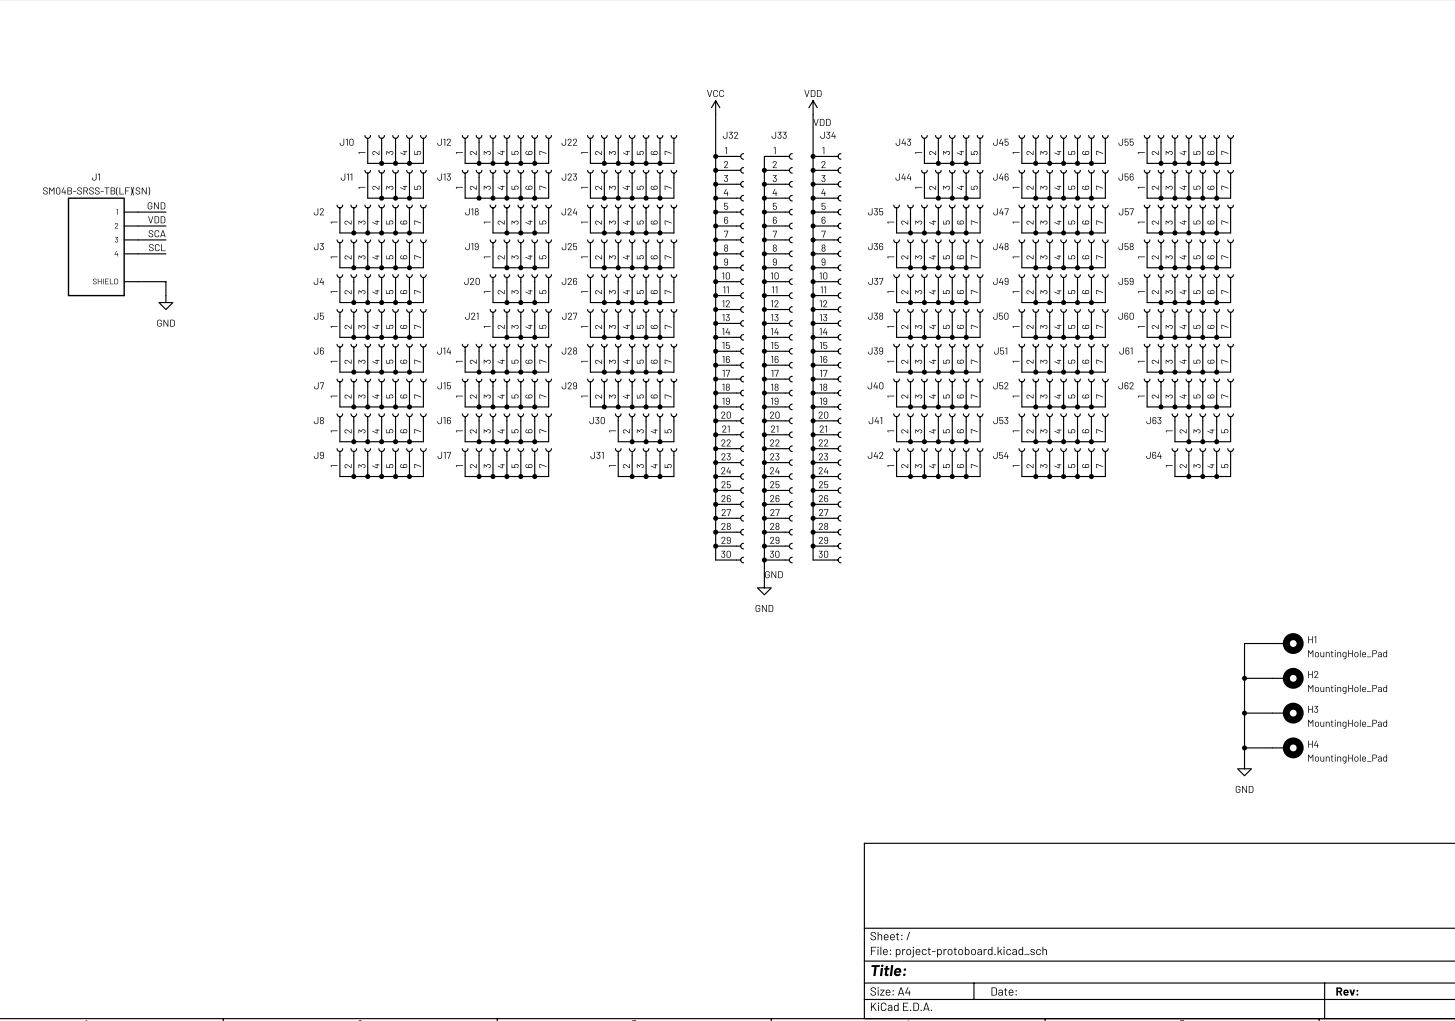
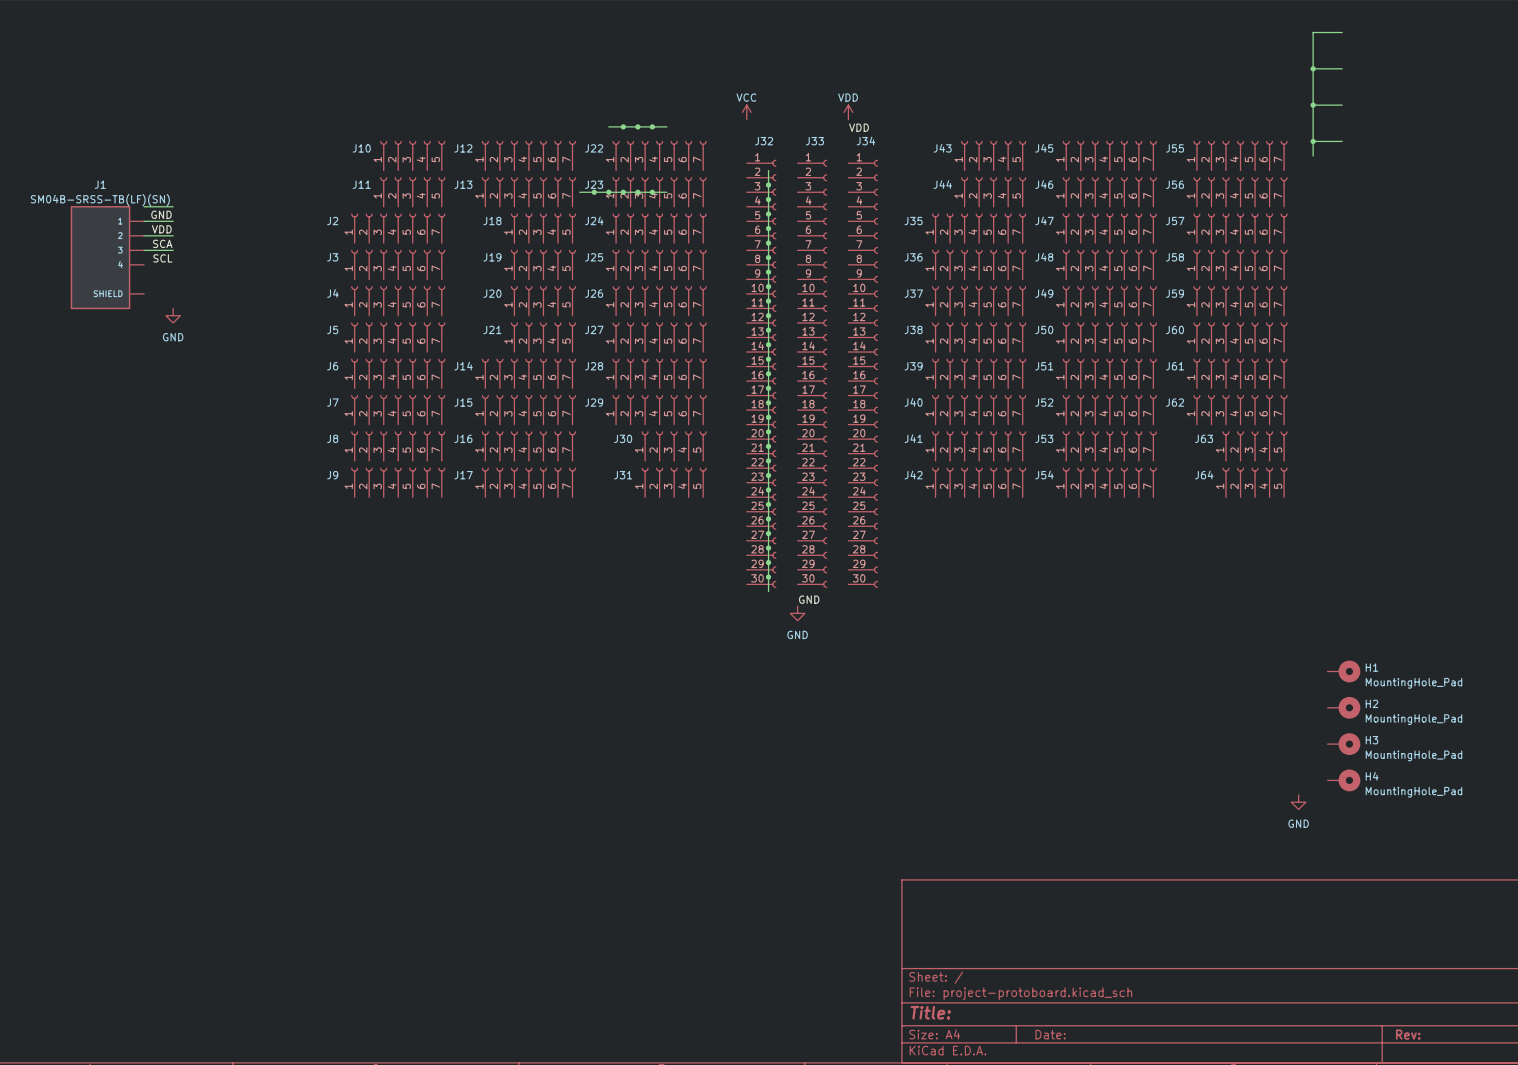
wire: none -> (1342, 32) (1313, 32) (1313, 155)
wire: none -> (1313, 68) (1342, 68)
junction: none -> (1313, 68)
wire: none -> (1313, 105) (1342, 105)
junction: none -> (1313, 105)
wire: (715, 114) (715, 560) -> none
wire: (813, 114) (813, 560) -> none
wire: none -> (608, 126) (666, 126)
junction: none -> (623, 126)
junction: none -> (637, 126)
junction: none -> (652, 126)
wire: none -> (1313, 141) (1342, 141)
junction: none -> (1313, 141)
junction: (715, 156) -> none
wire: (764, 156) (764, 580) -> none
junction: (813, 156) -> none
wire: (367, 163) (423, 163) -> none
junction: (381, 163) -> none
junction: (395, 163) -> none
junction: (409, 163) -> none
wire: (465, 163) (548, 163) -> none
junction: (479, 163) -> none
junction: (492, 163) -> none
junction: (506, 163) -> none
junction: (520, 163) -> none
junction: (534, 163) -> none
wire: (590, 163) (673, 163) -> none
junction: (604, 163) -> none
junction: (618, 163) -> none
junction: (632, 163) -> none
junction: (646, 163) -> none
junction: (659, 163) -> none
wire: none -> (768, 170) (768, 591)
wire: (924, 163) (980, 163) -> none
junction: (938, 163) -> none
junction: (952, 163) -> none
junction: (966, 163) -> none
wire: (1021, 163) (1105, 163) -> none
junction: (1035, 163) -> none
junction: (1049, 163) -> none
junction: (1063, 163) -> none
junction: (1077, 163) -> none
junction: (1091, 163) -> none
wire: (1147, 163) (1230, 163) -> none
junction: (1161, 163) -> none
junction: (1174, 163) -> none
junction: (1188, 163) -> none
junction: (1202, 163) -> none
junction: (1216, 163) -> none
junction: (715, 170) -> none
junction: (764, 170) -> none
junction: (813, 170) -> none
junction: none -> (768, 185)
junction: none -> (594, 192)
junction: none -> (608, 192)
junction: none -> (623, 192)
junction: none -> (637, 192)
junction: none -> (652, 192)
junction: (715, 184) -> none
junction: (764, 184) -> none
junction: (813, 184) -> none
junction: none -> (768, 199)
wire: (367, 198) (423, 198) -> none
junction: (381, 198) -> none
junction: (395, 198) -> none
junction: (409, 198) -> none
wire: (465, 198) (548, 198) -> none
junction: (479, 198) -> none
junction: (492, 198) -> none
junction: (506, 198) -> none
junction: (520, 198) -> none
junction: (534, 198) -> none
wire: (590, 198) (673, 198) -> (579, 192) (666, 192)
junction: (604, 198) -> none
junction: (618, 198) -> none
junction: (632, 198) -> none
junction: (646, 198) -> none
junction: (659, 198) -> none
junction: (715, 198) -> none
junction: (764, 198) -> none
junction: (813, 198) -> none
wire: (924, 198) (980, 198) -> none
junction: (938, 198) -> none
junction: (952, 198) -> none
junction: (966, 198) -> none
wire: (1021, 198) (1105, 198) -> none
junction: (1035, 198) -> none
junction: (1049, 198) -> none
junction: (1063, 198) -> none
junction: (1077, 198) -> none
junction: (1091, 198) -> none
wire: (1147, 198) (1230, 198) -> none
junction: (1161, 198) -> none
junction: (1174, 198) -> none
junction: (1188, 198) -> none
junction: (1202, 198) -> none
junction: (1216, 198) -> none
junction: none -> (768, 214)
junction: (715, 212) -> none
junction: (764, 212) -> none
junction: (813, 212) -> none
junction: none -> (768, 228)
junction: (715, 226) -> none
junction: (764, 226) -> none
junction: (813, 226) -> none
wire: (339, 232) (423, 232) -> none
junction: (353, 232) -> none
junction: (367, 232) -> none
junction: (381, 232) -> none
junction: (395, 232) -> none
junction: (409, 232) -> none
wire: (492, 232) (548, 232) -> none
junction: (506, 232) -> none
junction: (520, 232) -> none
junction: (534, 232) -> none
wire: (590, 232) (673, 232) -> none
junction: (604, 232) -> none
junction: (618, 232) -> none
junction: (632, 232) -> none
junction: (646, 232) -> none
junction: (659, 232) -> none
junction: none -> (768, 243)
wire: (896, 232) (980, 232) -> none
junction: (910, 232) -> none
junction: (924, 232) -> none
junction: (938, 232) -> none
junction: (952, 232) -> none
junction: (966, 232) -> none
wire: (1021, 232) (1105, 232) -> none
junction: (1035, 232) -> none
junction: (1049, 232) -> none
junction: (1063, 232) -> none
junction: (1077, 232) -> none
junction: (1091, 232) -> none
wire: (1147, 232) (1230, 232) -> none
junction: (1161, 232) -> none
junction: (1174, 232) -> none
junction: (1188, 232) -> none
junction: (1202, 232) -> none
junction: (1216, 232) -> none
junction: (715, 239) -> none
junction: (764, 239) -> none
junction: (813, 239) -> none
junction: none -> (768, 257)
wire: (138, 253) (165, 253) -> (144, 206) (173, 206)
junction: (715, 253) -> none
junction: (764, 253) -> none
junction: (813, 253) -> none
junction: none -> (768, 272)
wire: (339, 267) (423, 267) -> none
junction: (353, 267) -> none
junction: (367, 267) -> none
junction: (381, 267) -> none
junction: (395, 267) -> none
junction: (409, 267) -> none
wire: (492, 267) (548, 267) -> none
junction: (506, 267) -> none
junction: (520, 267) -> none
junction: (534, 267) -> none
wire: (590, 267) (673, 267) -> none
junction: (604, 267) -> none
junction: (618, 267) -> none
junction: (632, 267) -> none
junction: (646, 267) -> none
junction: (659, 267) -> none
junction: (715, 267) -> none
junction: (764, 267) -> none
junction: (813, 267) -> none
wire: (896, 267) (980, 267) -> none
junction: (910, 267) -> none
junction: (924, 267) -> none
junction: (938, 267) -> none
junction: (952, 267) -> none
junction: (966, 267) -> none
wire: (1021, 267) (1105, 267) -> none
junction: (1035, 267) -> none
junction: (1049, 267) -> none
junction: (1063, 267) -> none
junction: (1077, 267) -> none
junction: (1091, 267) -> none
wire: (1147, 267) (1230, 267) -> none
junction: (1161, 267) -> none
junction: (1174, 267) -> none
junction: (1188, 267) -> none
junction: (1202, 267) -> none
junction: (1216, 267) -> none
junction: none -> (768, 286)
wire: (138, 281) (165, 281) (165, 295) -> none
junction: (715, 281) -> none
junction: (764, 281) -> none
junction: (813, 281) -> none
junction: none -> (768, 301)
junction: (715, 295) -> none
junction: (764, 295) -> none
junction: (813, 295) -> none
wire: (339, 302) (423, 302) -> none
junction: (353, 302) -> none
junction: (367, 302) -> none
junction: (381, 302) -> none
junction: (395, 302) -> none
junction: (409, 302) -> none
wire: (492, 302) (548, 302) -> none
junction: (506, 302) -> none
junction: (520, 302) -> none
junction: (534, 302) -> none
wire: (590, 302) (673, 302) -> none
junction: (604, 302) -> none
junction: (618, 302) -> none
junction: (632, 302) -> none
junction: (646, 302) -> none
junction: (659, 302) -> none
junction: none -> (768, 315)
wire: (896, 302) (980, 302) -> none
junction: (910, 302) -> none
junction: (924, 302) -> none
junction: (938, 302) -> none
junction: (952, 302) -> none
junction: (966, 302) -> none
wire: (1021, 302) (1105, 302) -> none
junction: (1035, 302) -> none
junction: (1049, 302) -> none
junction: (1063, 302) -> none
junction: (1077, 302) -> none
junction: (1091, 302) -> none
wire: (1147, 302) (1230, 302) -> none
junction: (1161, 302) -> none
junction: (1174, 302) -> none
junction: (1188, 302) -> none
junction: (1202, 302) -> none
junction: (1216, 302) -> none
junction: (715, 309) -> none
junction: (764, 309) -> none
junction: (813, 309) -> none
junction: none -> (768, 330)
junction: (715, 323) -> none
junction: (764, 323) -> none
junction: (813, 323) -> none
junction: none -> (768, 344)
wire: (339, 337) (423, 337) -> none
junction: (353, 337) -> none
junction: (367, 337) -> none
junction: (381, 337) -> none
junction: (395, 337) -> none
junction: (409, 337) -> none
wire: (492, 337) (548, 337) -> none
junction: (506, 337) -> none
junction: (520, 337) -> none
junction: (534, 337) -> none
wire: (590, 337) (673, 337) -> none
junction: (604, 337) -> none
junction: (618, 337) -> none
junction: (632, 337) -> none
junction: (646, 337) -> none
junction: (659, 337) -> none
junction: (715, 337) -> none
junction: (764, 337) -> none
junction: (813, 337) -> none
wire: (896, 337) (980, 337) -> none
junction: (910, 337) -> none
junction: (924, 337) -> none
junction: (938, 337) -> none
junction: (952, 337) -> none
junction: (966, 337) -> none
wire: (1021, 337) (1105, 337) -> none
junction: (1035, 337) -> none
junction: (1049, 337) -> none
junction: (1063, 337) -> none
junction: (1077, 337) -> none
junction: (1091, 337) -> none
wire: (1147, 337) (1230, 337) -> none
junction: (1161, 337) -> none
junction: (1174, 337) -> none
junction: (1188, 337) -> none
junction: (1202, 337) -> none
junction: (1216, 337) -> none
junction: none -> (768, 359)
junction: (715, 351) -> none
junction: (764, 351) -> none
junction: (813, 351) -> none
junction: none -> (768, 373)
junction: (715, 365) -> none
junction: (764, 365) -> none
junction: (813, 365) -> none
wire: (339, 372) (423, 372) -> none
junction: (353, 372) -> none
junction: (367, 372) -> none
junction: (381, 372) -> none
junction: (395, 372) -> none
junction: (409, 372) -> none
wire: (465, 372) (548, 372) -> none
junction: (479, 372) -> none
junction: (492, 372) -> none
junction: (506, 372) -> none
junction: (520, 372) -> none
junction: (534, 372) -> none
wire: (590, 372) (673, 372) -> none
junction: (604, 372) -> none
junction: (618, 372) -> none
junction: (632, 372) -> none
junction: (646, 372) -> none
junction: (659, 372) -> none
junction: none -> (768, 388)
wire: (896, 372) (980, 372) -> none
junction: (910, 372) -> none
junction: (924, 372) -> none
junction: (938, 372) -> none
junction: (952, 372) -> none
junction: (966, 372) -> none
wire: (1021, 372) (1105, 372) -> none
junction: (1035, 372) -> none
junction: (1049, 372) -> none
junction: (1063, 372) -> none
junction: (1077, 372) -> none
junction: (1091, 372) -> none
wire: (1147, 372) (1230, 372) -> none
junction: (1161, 372) -> none
junction: (1174, 372) -> none
junction: (1188, 372) -> none
junction: (1202, 372) -> none
junction: (1216, 372) -> none
junction: (715, 379) -> none
junction: (764, 379) -> none
junction: (813, 379) -> none
junction: none -> (768, 402)
junction: (715, 393) -> none
junction: (764, 393) -> none
junction: (813, 393) -> none
junction: none -> (768, 417)
wire: (339, 406) (423, 406) -> none
junction: (353, 406) -> none
junction: (367, 406) -> none
junction: (381, 406) -> none
junction: (395, 406) -> none
junction: (409, 406) -> none
wire: (465, 406) (548, 406) -> none
junction: (479, 406) -> none
junction: (492, 406) -> none
junction: (506, 406) -> none
junction: (520, 406) -> none
junction: (534, 406) -> none
wire: (590, 406) (673, 406) -> none
junction: (604, 406) -> none
junction: (618, 406) -> none
junction: (632, 406) -> none
junction: (646, 406) -> none
junction: (659, 406) -> none
junction: (715, 406) -> none
junction: (764, 406) -> none
junction: (813, 406) -> none
wire: (896, 406) (980, 406) -> none
junction: (910, 406) -> none
junction: (924, 406) -> none
junction: (938, 406) -> none
junction: (952, 406) -> none
junction: (966, 406) -> none
wire: (1021, 406) (1105, 406) -> none
junction: (1035, 406) -> none
junction: (1049, 406) -> none
junction: (1063, 406) -> none
junction: (1077, 406) -> none
junction: (1091, 406) -> none
wire: (1147, 406) (1230, 406) -> none
junction: (1161, 406) -> none
junction: (1174, 406) -> none
junction: (1188, 406) -> none
junction: (1202, 406) -> none
junction: (1216, 406) -> none
junction: none -> (768, 431)
junction: (715, 420) -> none
junction: (764, 420) -> none
junction: (813, 420) -> none
junction: none -> (768, 446)
junction: (715, 434) -> none
junction: (764, 434) -> none
junction: (813, 434) -> none
wire: (339, 441) (423, 441) -> none
junction: (353, 441) -> none
junction: (367, 441) -> none
junction: (381, 441) -> none
junction: (395, 441) -> none
junction: (409, 441) -> none
wire: (465, 441) (548, 441) -> none
junction: (479, 441) -> none
junction: (492, 441) -> none
junction: (506, 441) -> none
junction: (520, 441) -> none
junction: (534, 441) -> none
wire: (618, 441) (673, 441) -> none
junction: (632, 441) -> none
junction: (646, 441) -> none
junction: (659, 441) -> none
junction: none -> (768, 460)
wire: (896, 441) (980, 441) -> none
junction: (910, 441) -> none
junction: (924, 441) -> none
junction: (938, 441) -> none
junction: (952, 441) -> none
junction: (966, 441) -> none
wire: (1021, 441) (1105, 441) -> none
junction: (1035, 441) -> none
junction: (1049, 441) -> none
junction: (1063, 441) -> none
junction: (1077, 441) -> none
junction: (1091, 441) -> none
wire: (1174, 441) (1230, 441) -> none
junction: (1188, 441) -> none
junction: (1202, 441) -> none
junction: (1216, 441) -> none
junction: (715, 448) -> none
junction: (764, 448) -> none
junction: (813, 448) -> none
junction: none -> (768, 475)
junction: (715, 462) -> none
junction: (764, 462) -> none
junction: (813, 462) -> none
junction: none -> (768, 489)
wire: (339, 476) (423, 476) -> none
junction: (353, 476) -> none
junction: (367, 476) -> none
junction: (381, 476) -> none
junction: (395, 476) -> none
junction: (409, 476) -> none
wire: (465, 476) (548, 476) -> none
junction: (479, 476) -> none
junction: (492, 476) -> none
junction: (506, 476) -> none
junction: (520, 476) -> none
junction: (534, 476) -> none
wire: (618, 476) (673, 476) -> none
junction: (632, 476) -> none
junction: (646, 476) -> none
junction: (659, 476) -> none
junction: (715, 476) -> none
junction: (764, 476) -> none
junction: (813, 476) -> none
wire: (896, 476) (980, 476) -> none
junction: (910, 476) -> none
junction: (924, 476) -> none
junction: (938, 476) -> none
junction: (952, 476) -> none
junction: (966, 476) -> none
wire: (1021, 476) (1105, 476) -> none
junction: (1035, 476) -> none
junction: (1049, 476) -> none
junction: (1063, 476) -> none
junction: (1077, 476) -> none
junction: (1091, 476) -> none
wire: (1174, 476) (1230, 476) -> none
junction: (1188, 476) -> none
junction: (1202, 476) -> none
junction: (1216, 476) -> none
junction: none -> (768, 504)
junction: (715, 490) -> none
junction: (764, 490) -> none
junction: (813, 490) -> none
junction: none -> (768, 519)
junction: (715, 504) -> none
junction: (764, 504) -> none
junction: (813, 504) -> none
junction: none -> (768, 533)
junction: (715, 518) -> none
junction: (764, 518) -> none
junction: (813, 518) -> none
junction: none -> (768, 548)
junction: (715, 532) -> none
junction: (764, 532) -> none
junction: (813, 532) -> none
junction: none -> (768, 562)
junction: (715, 546) -> none
junction: (764, 546) -> none
junction: (813, 546) -> none
junction: none -> (768, 577)
junction: (764, 560) -> none
wire: (1272, 643) (1244, 643) (1244, 761) -> none
wire: (1244, 678) (1272, 678) -> none
junction: (1244, 678) -> none
wire: (1244, 713) (1272, 713) -> none
junction: (1244, 713) -> none
wire: (1244, 747) (1272, 747) -> none
junction: (1244, 747) -> none

